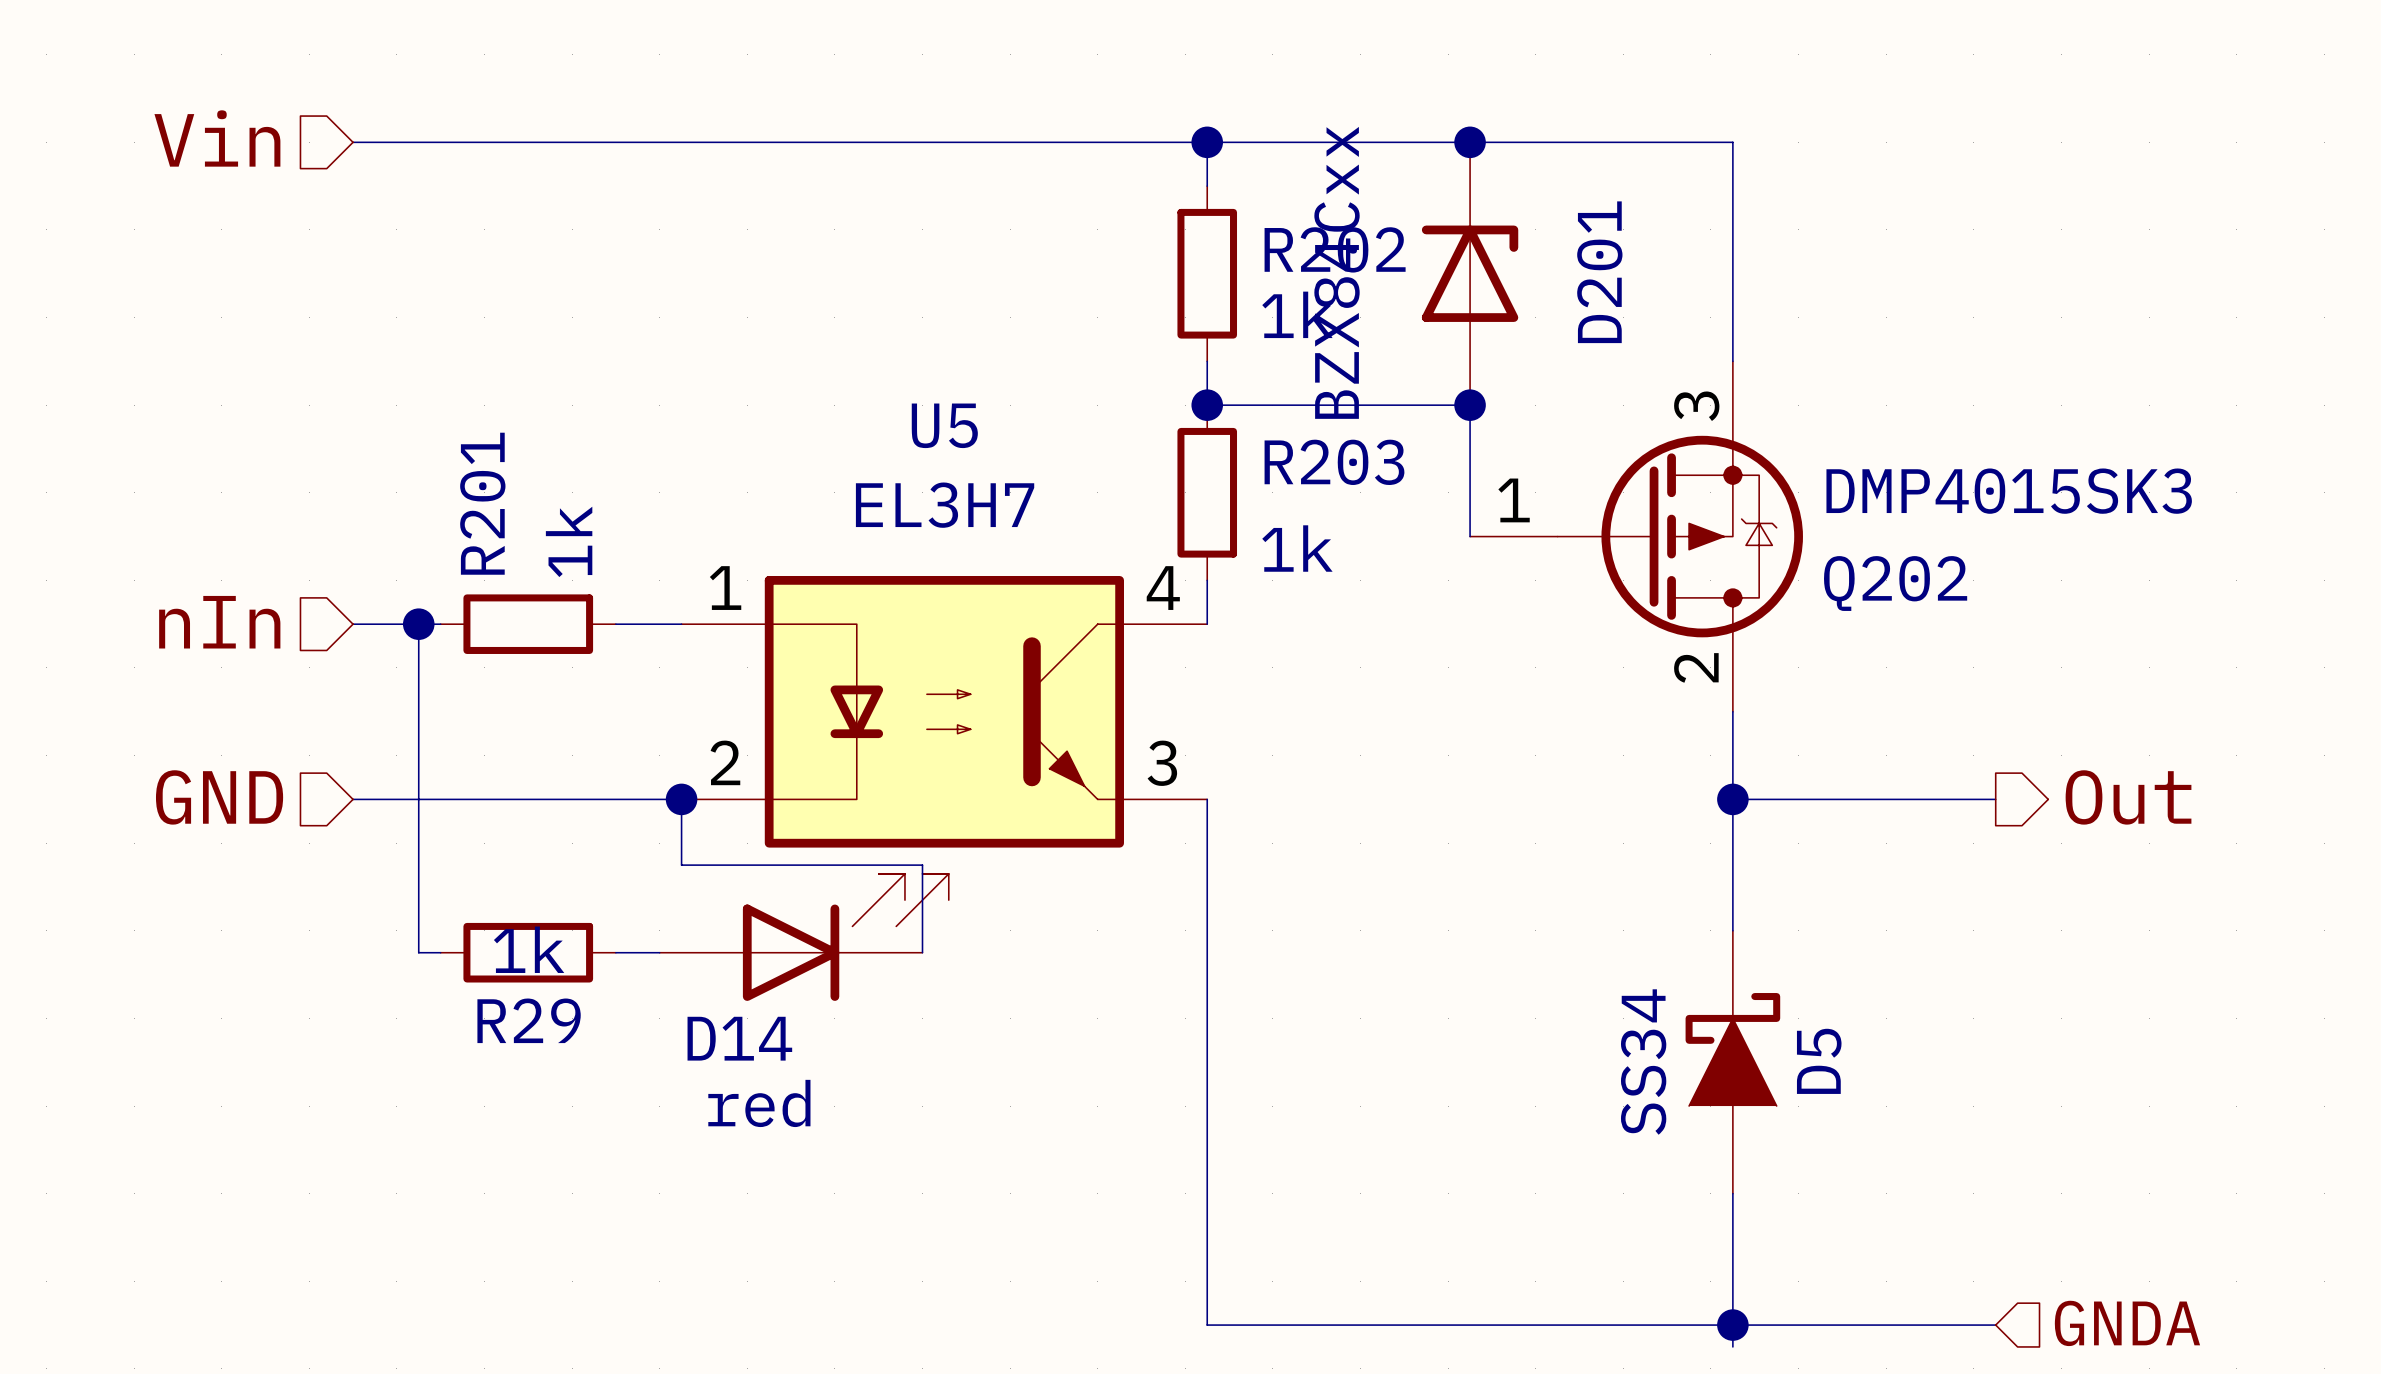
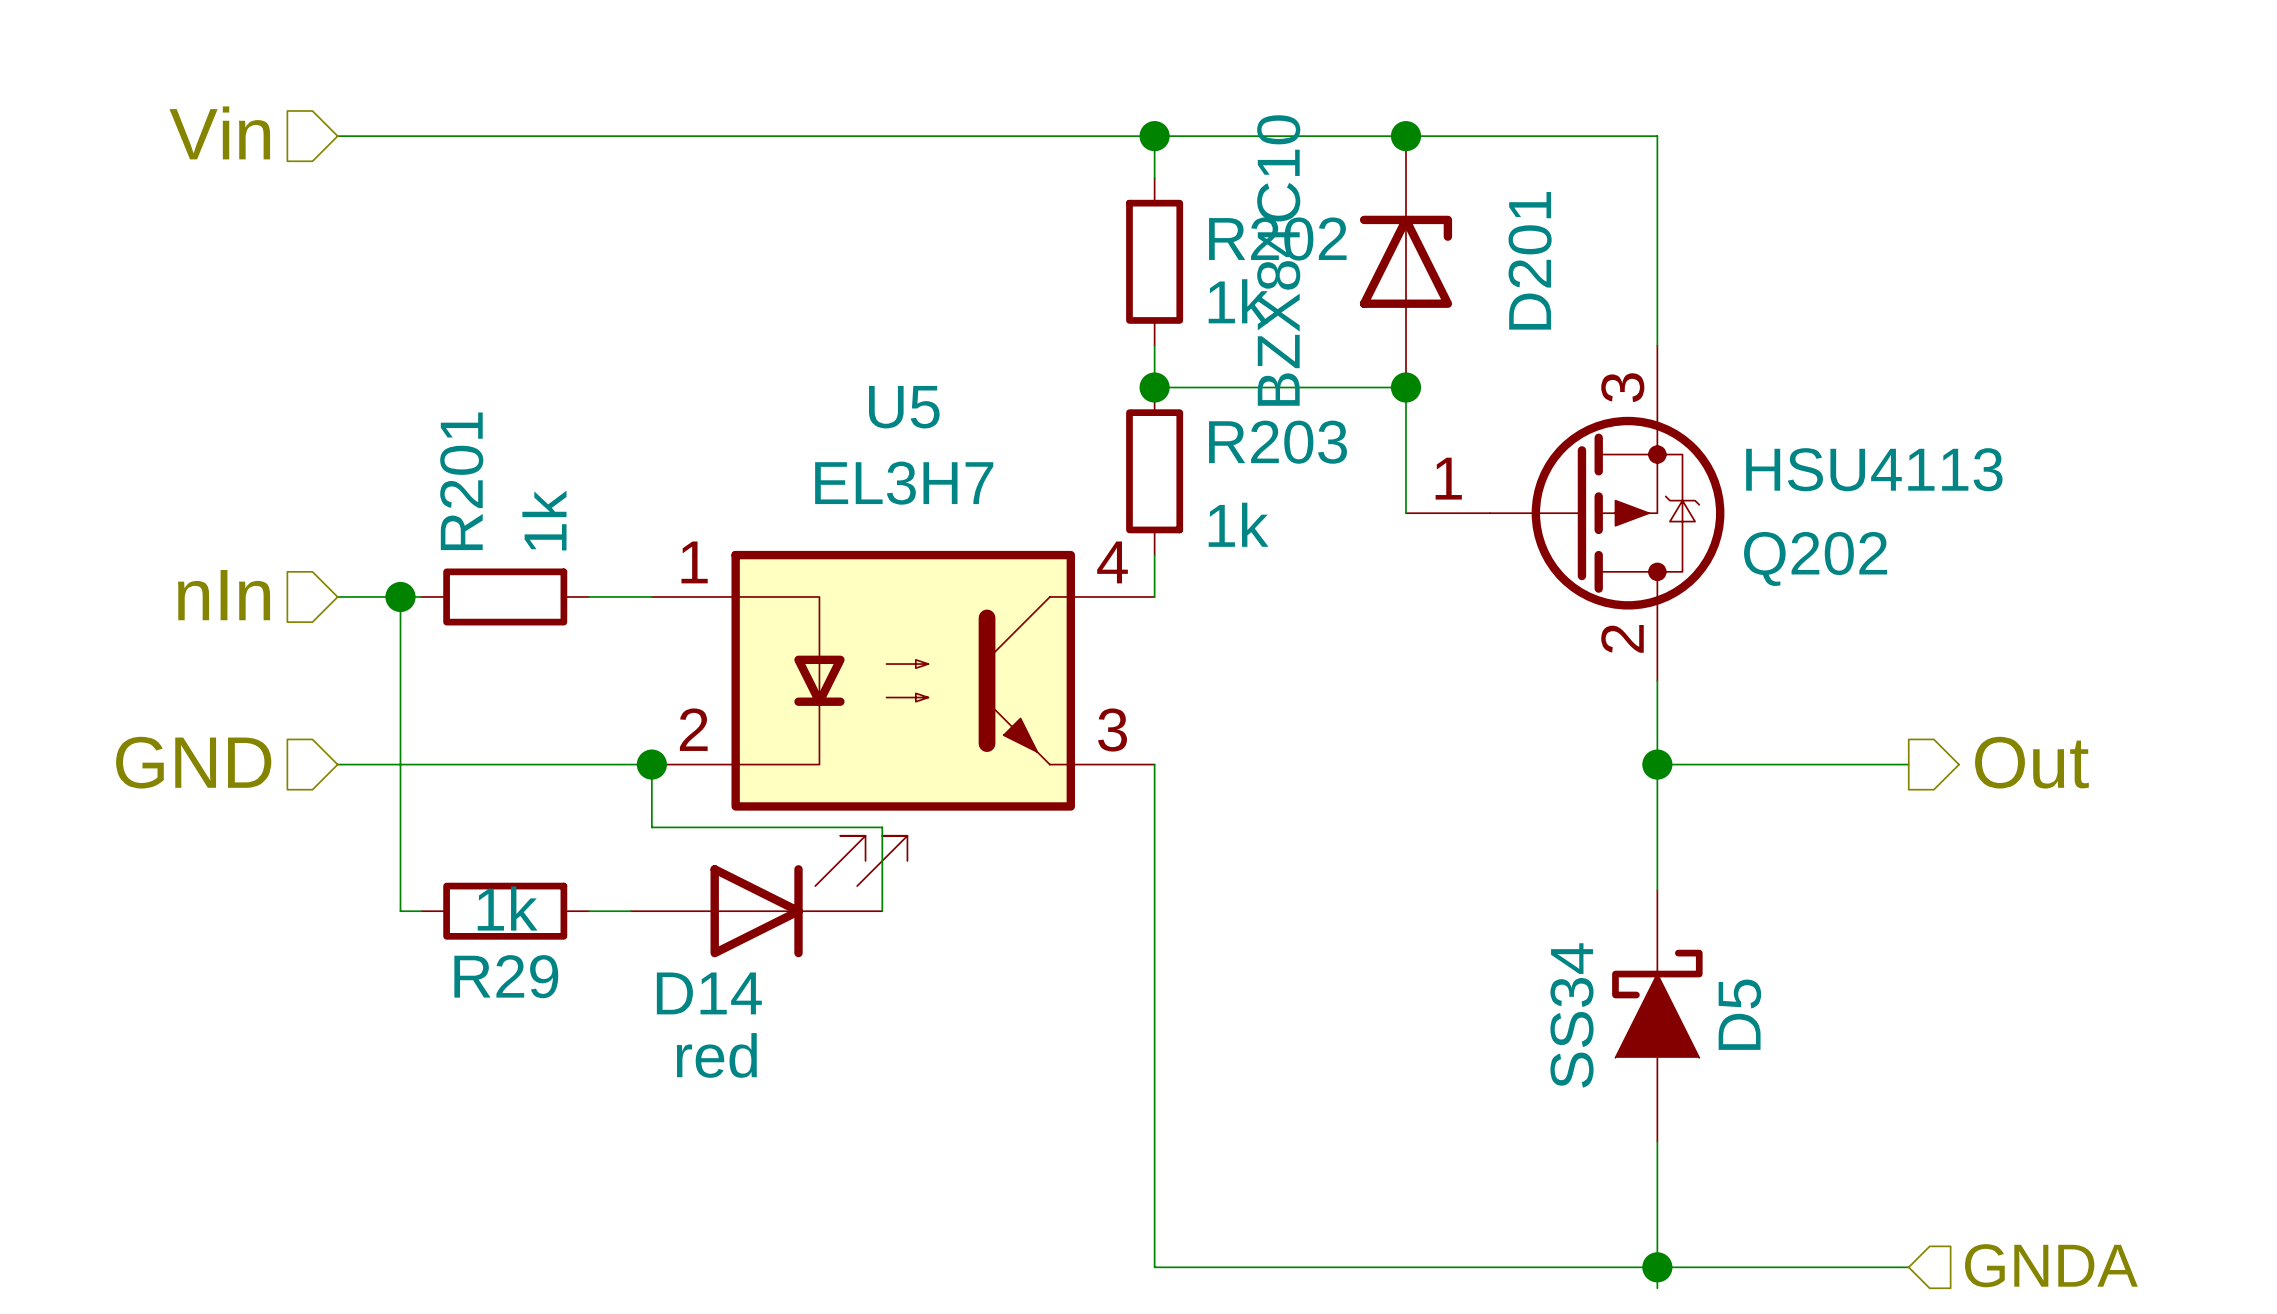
D201 value: BZX84Cxx (1337, 272) -> BZX84C10 (1278, 260)
Q202 value: DMP4015SK3 (2009, 491) -> HSU4113 (1874, 469)

